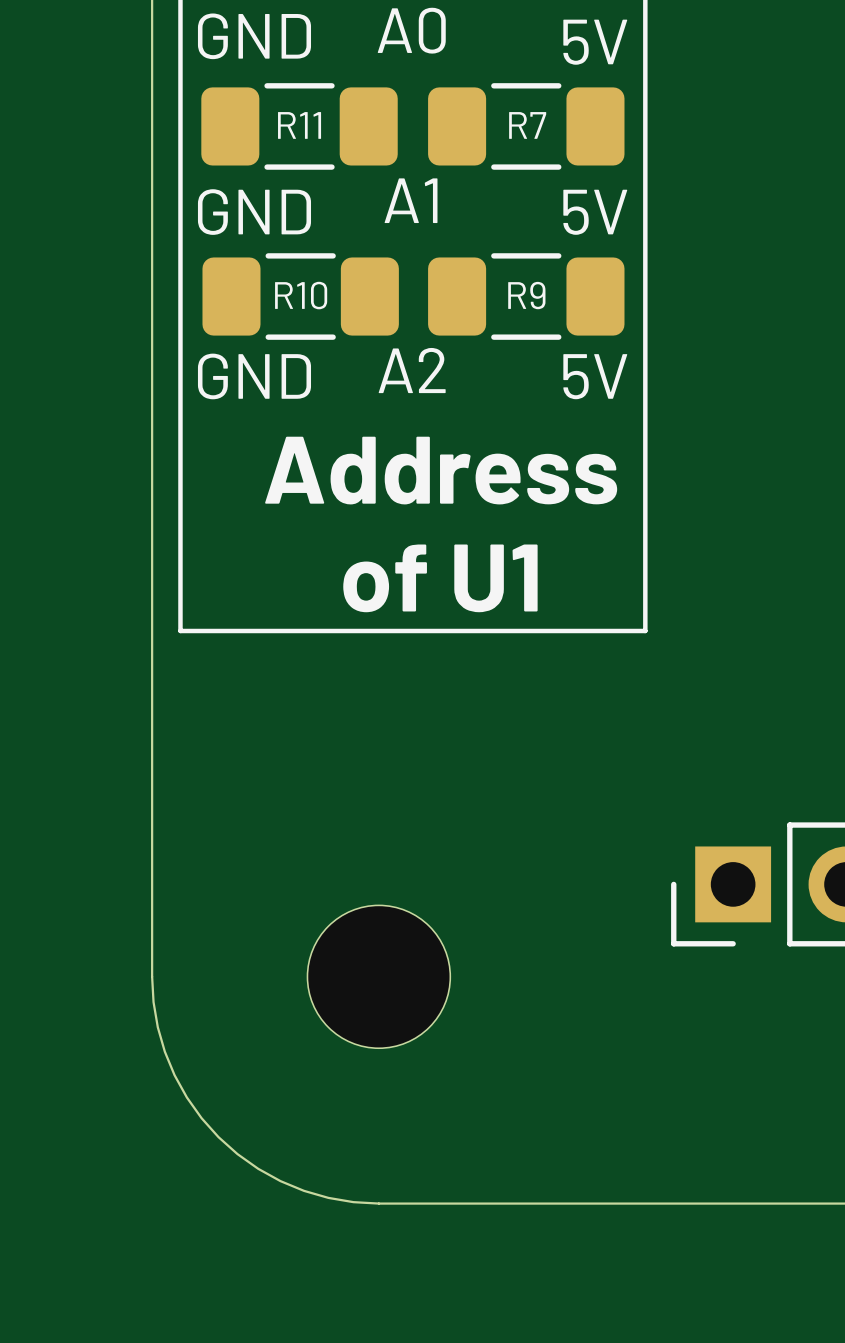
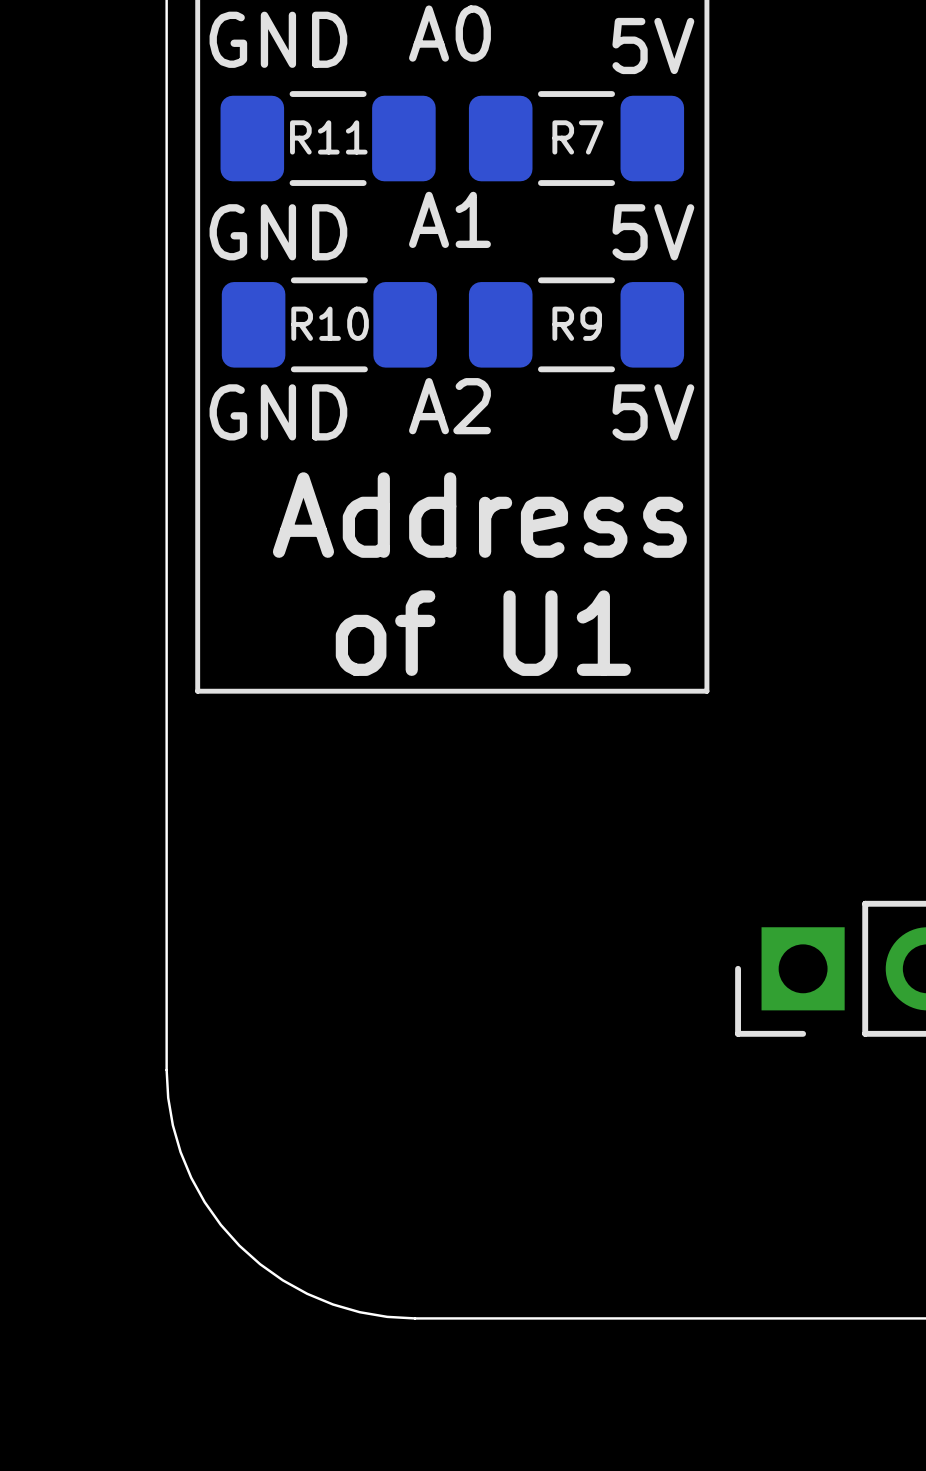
part: (378, 976) -> none

